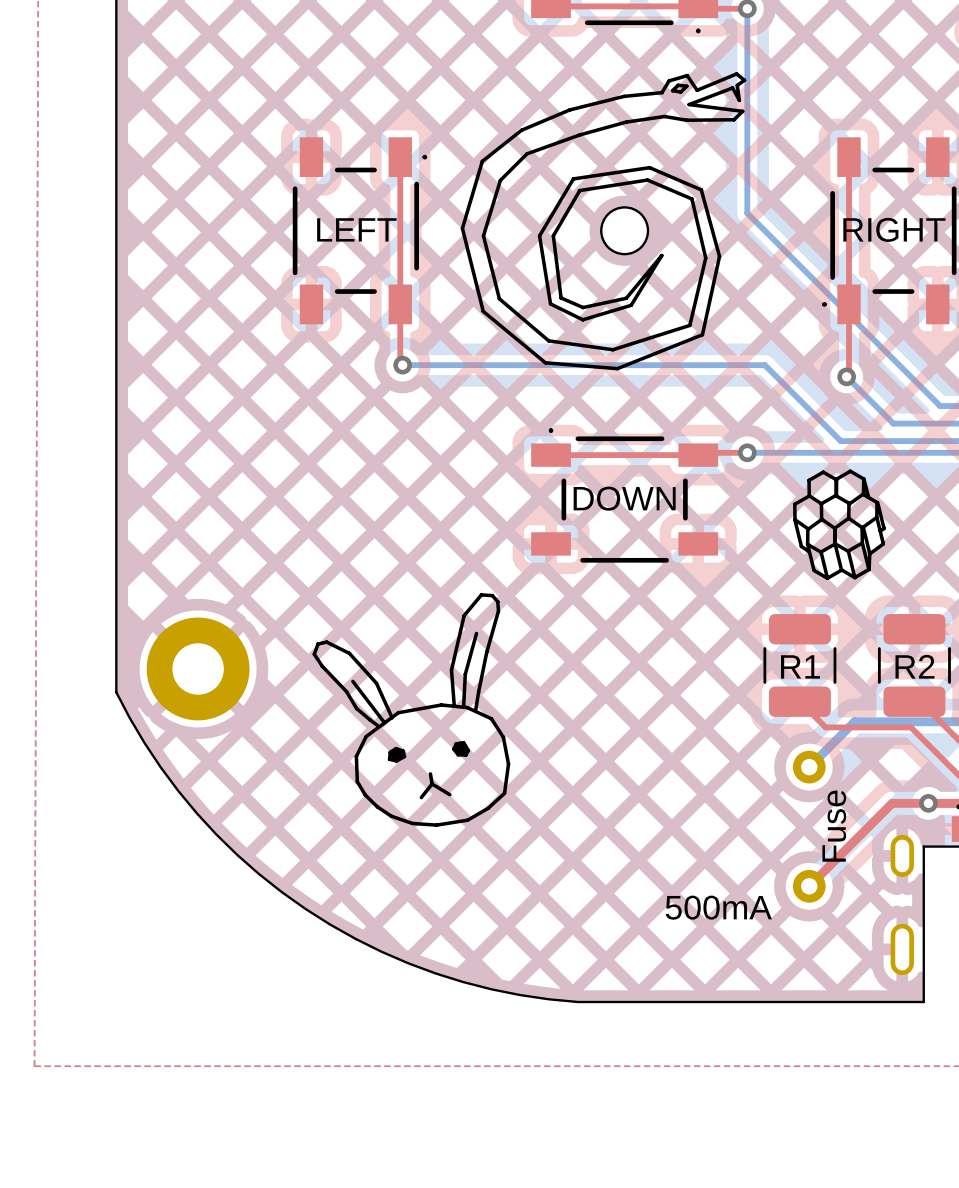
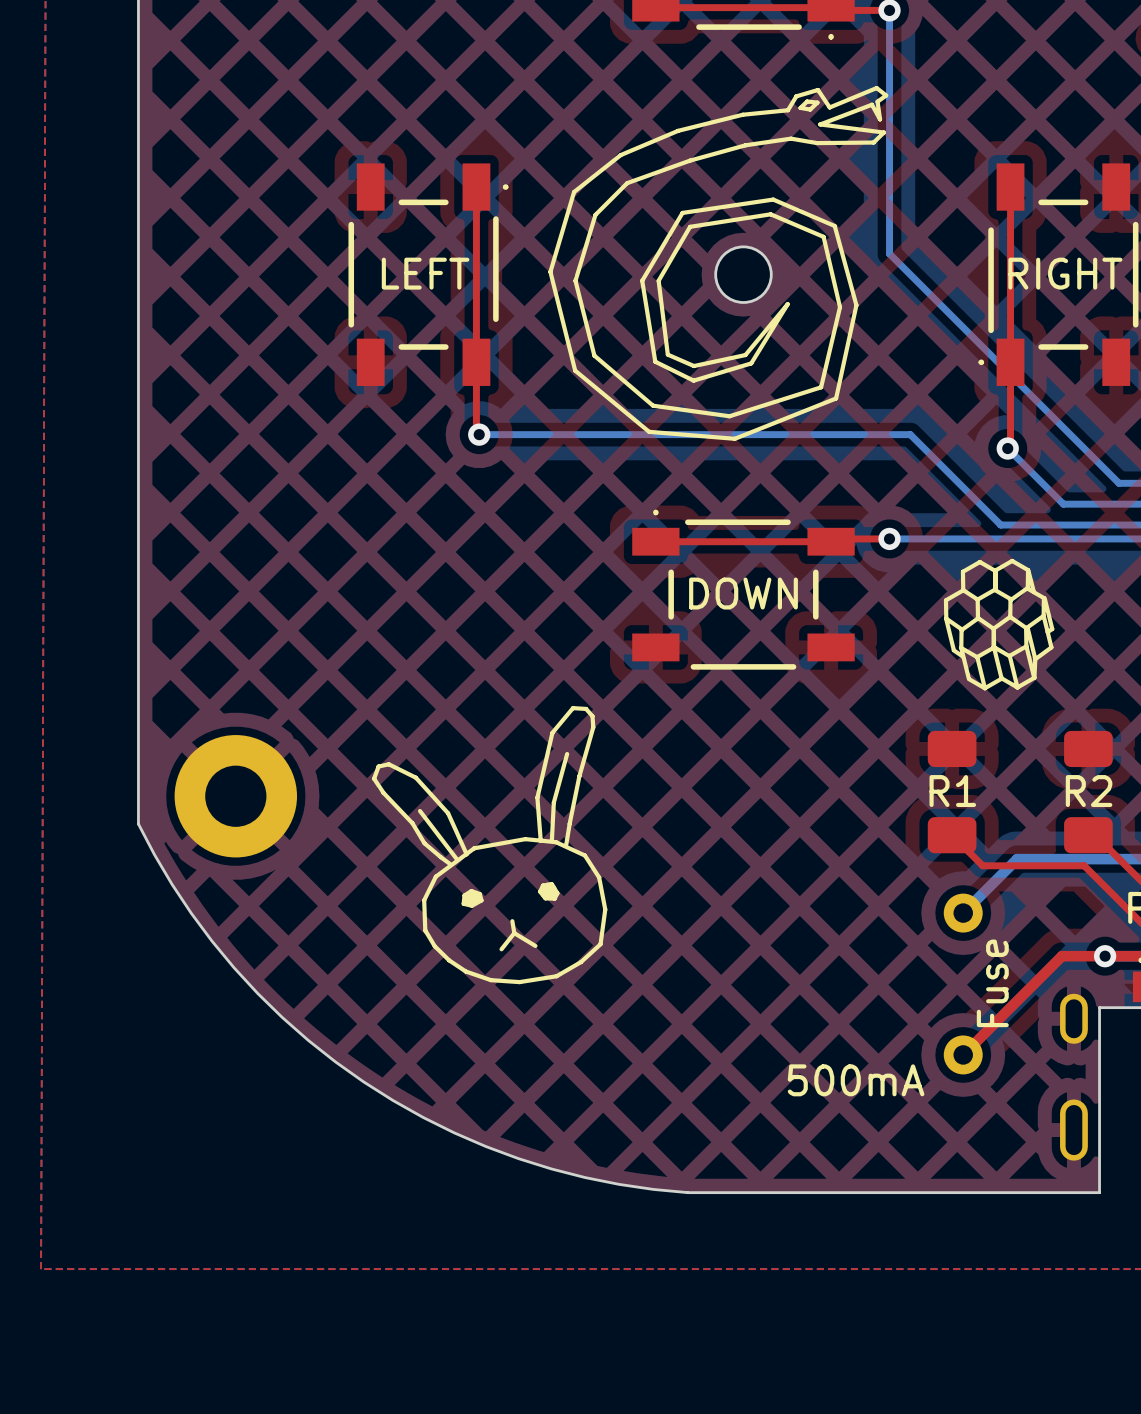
R1 footprint: [763, 614, 837, 717] -> [927, 730, 977, 854]
R2 footprint: [877, 614, 951, 717] -> [1064, 730, 1113, 854]

